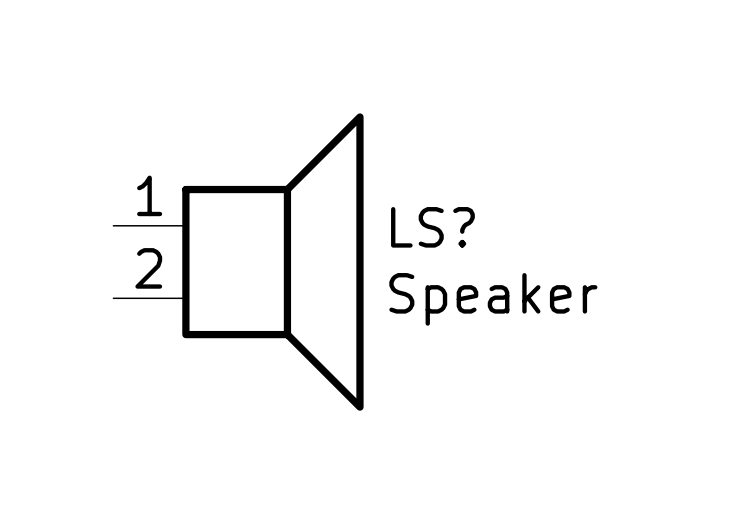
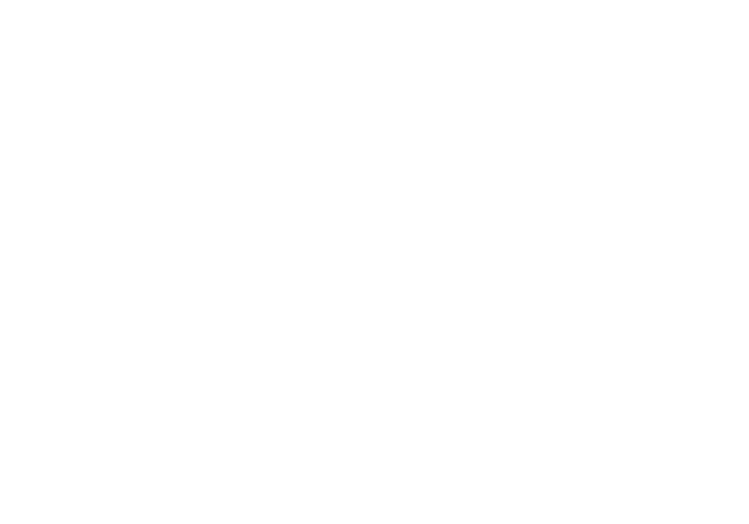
LS?: Speaker (238, 262) -> none

